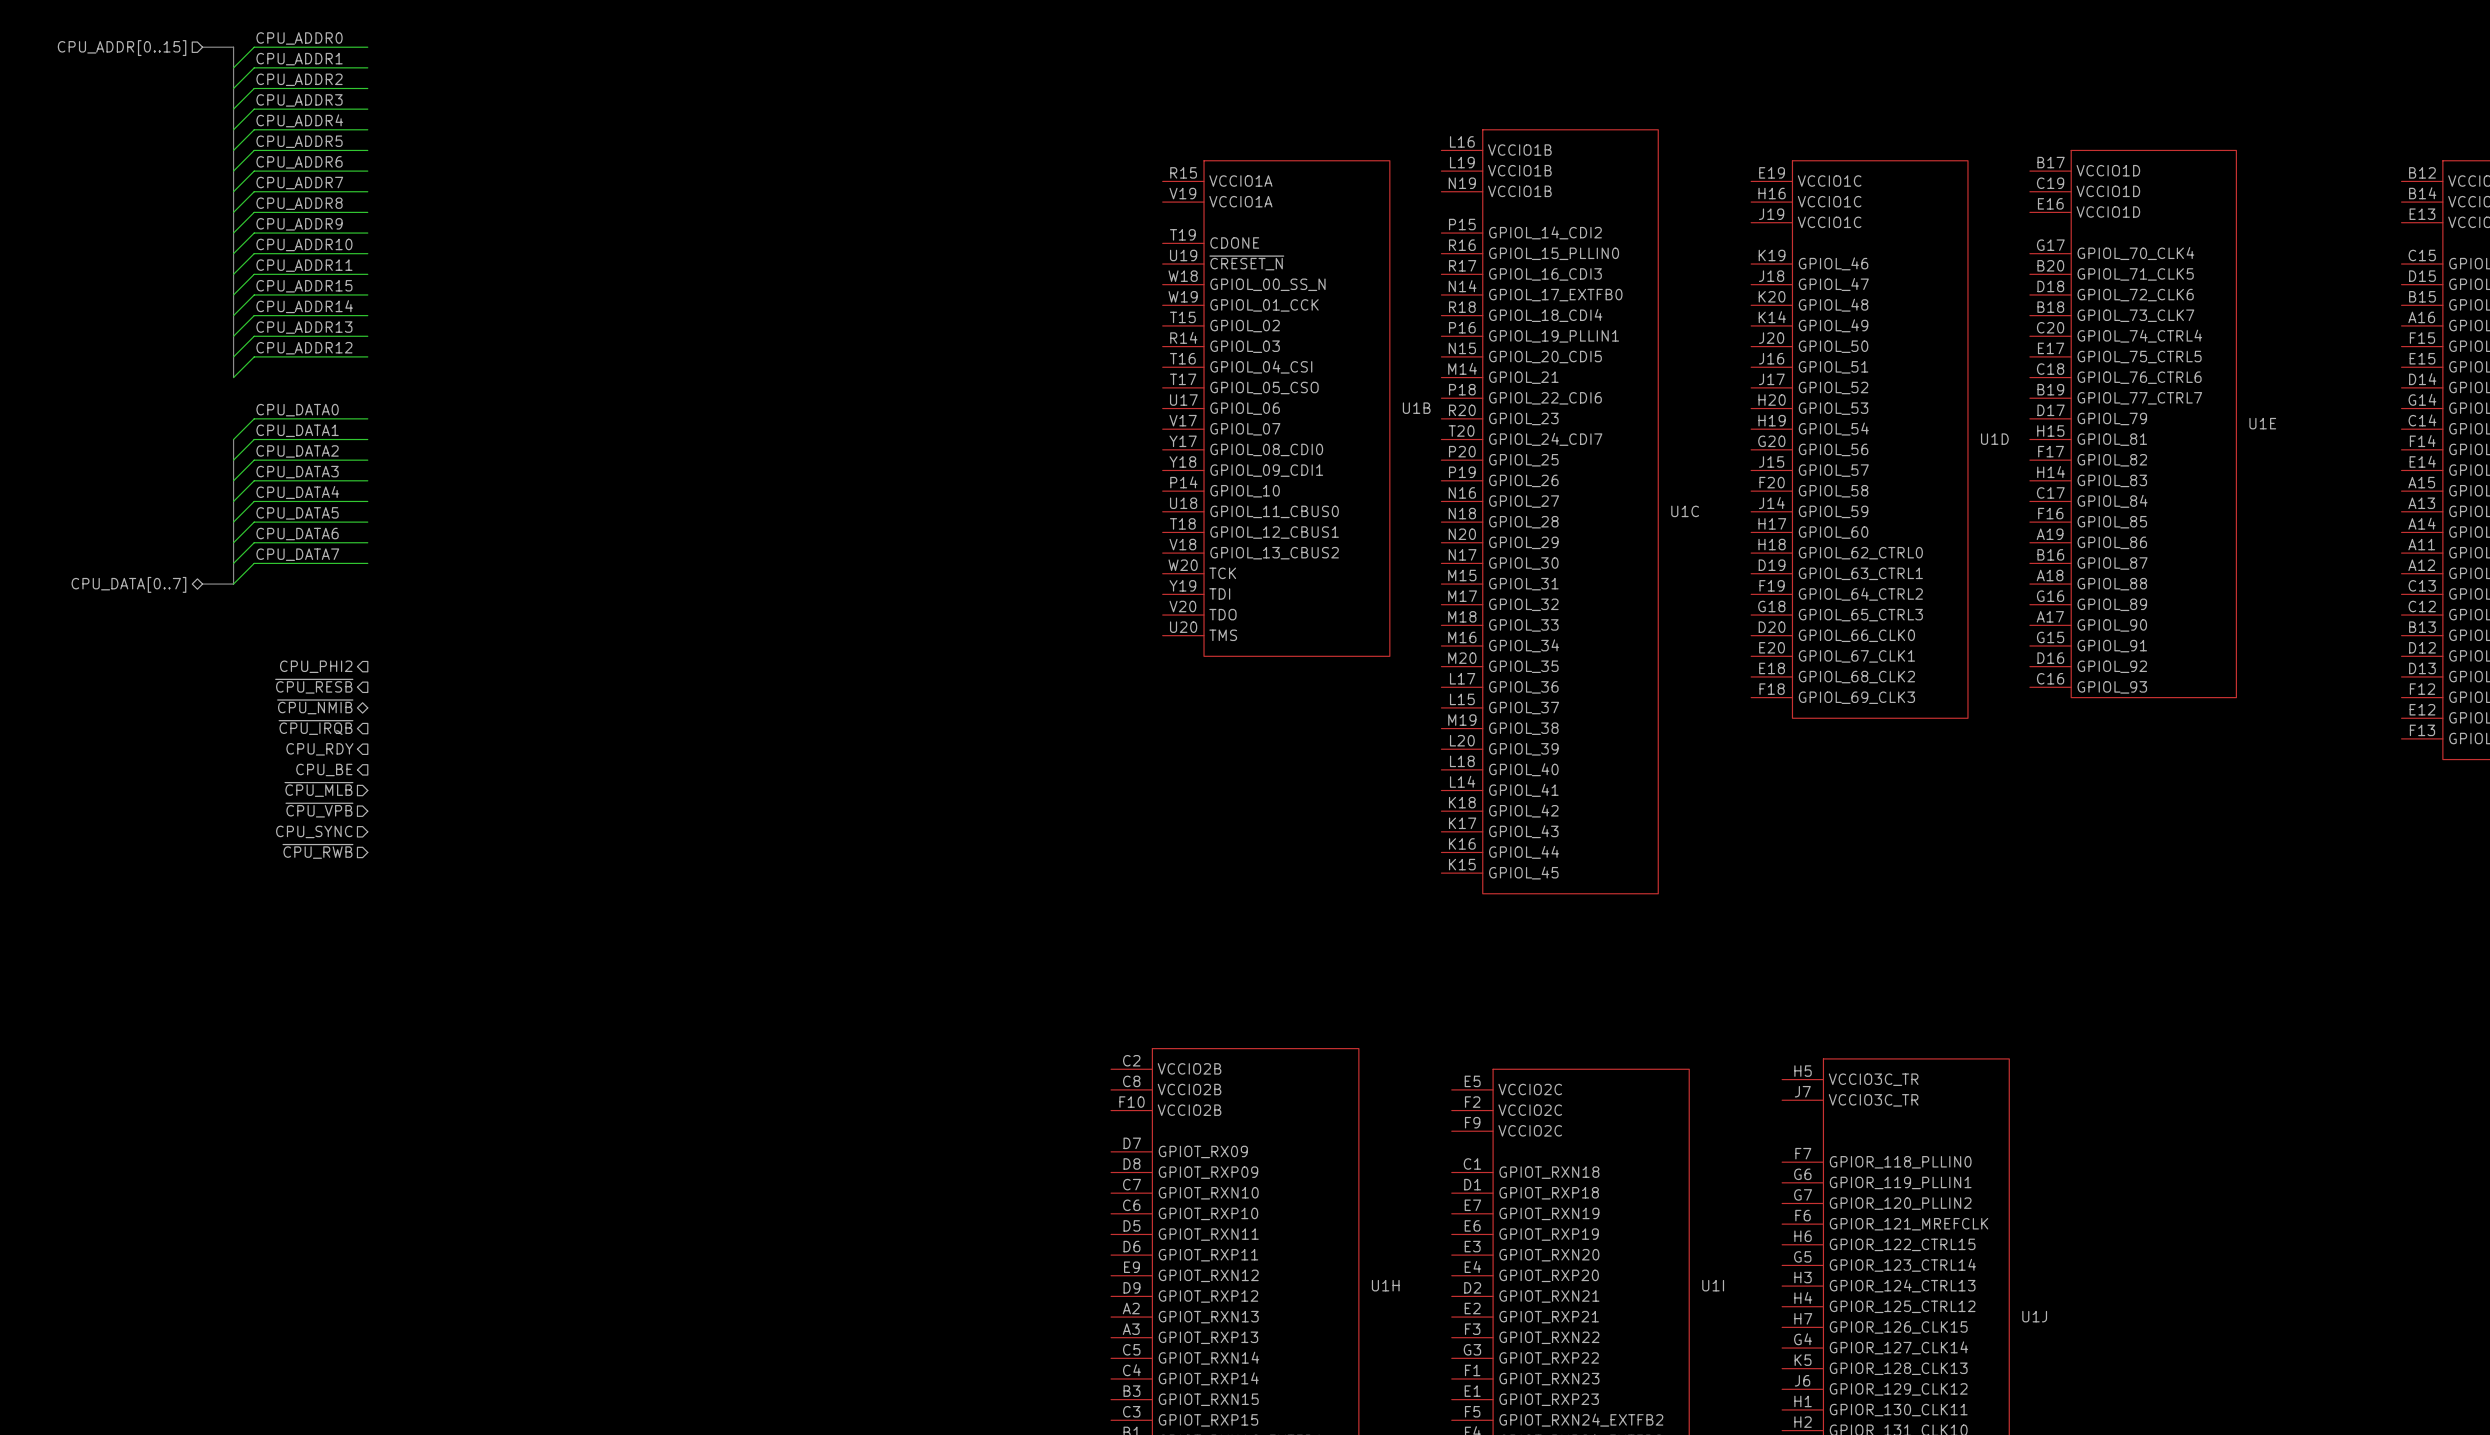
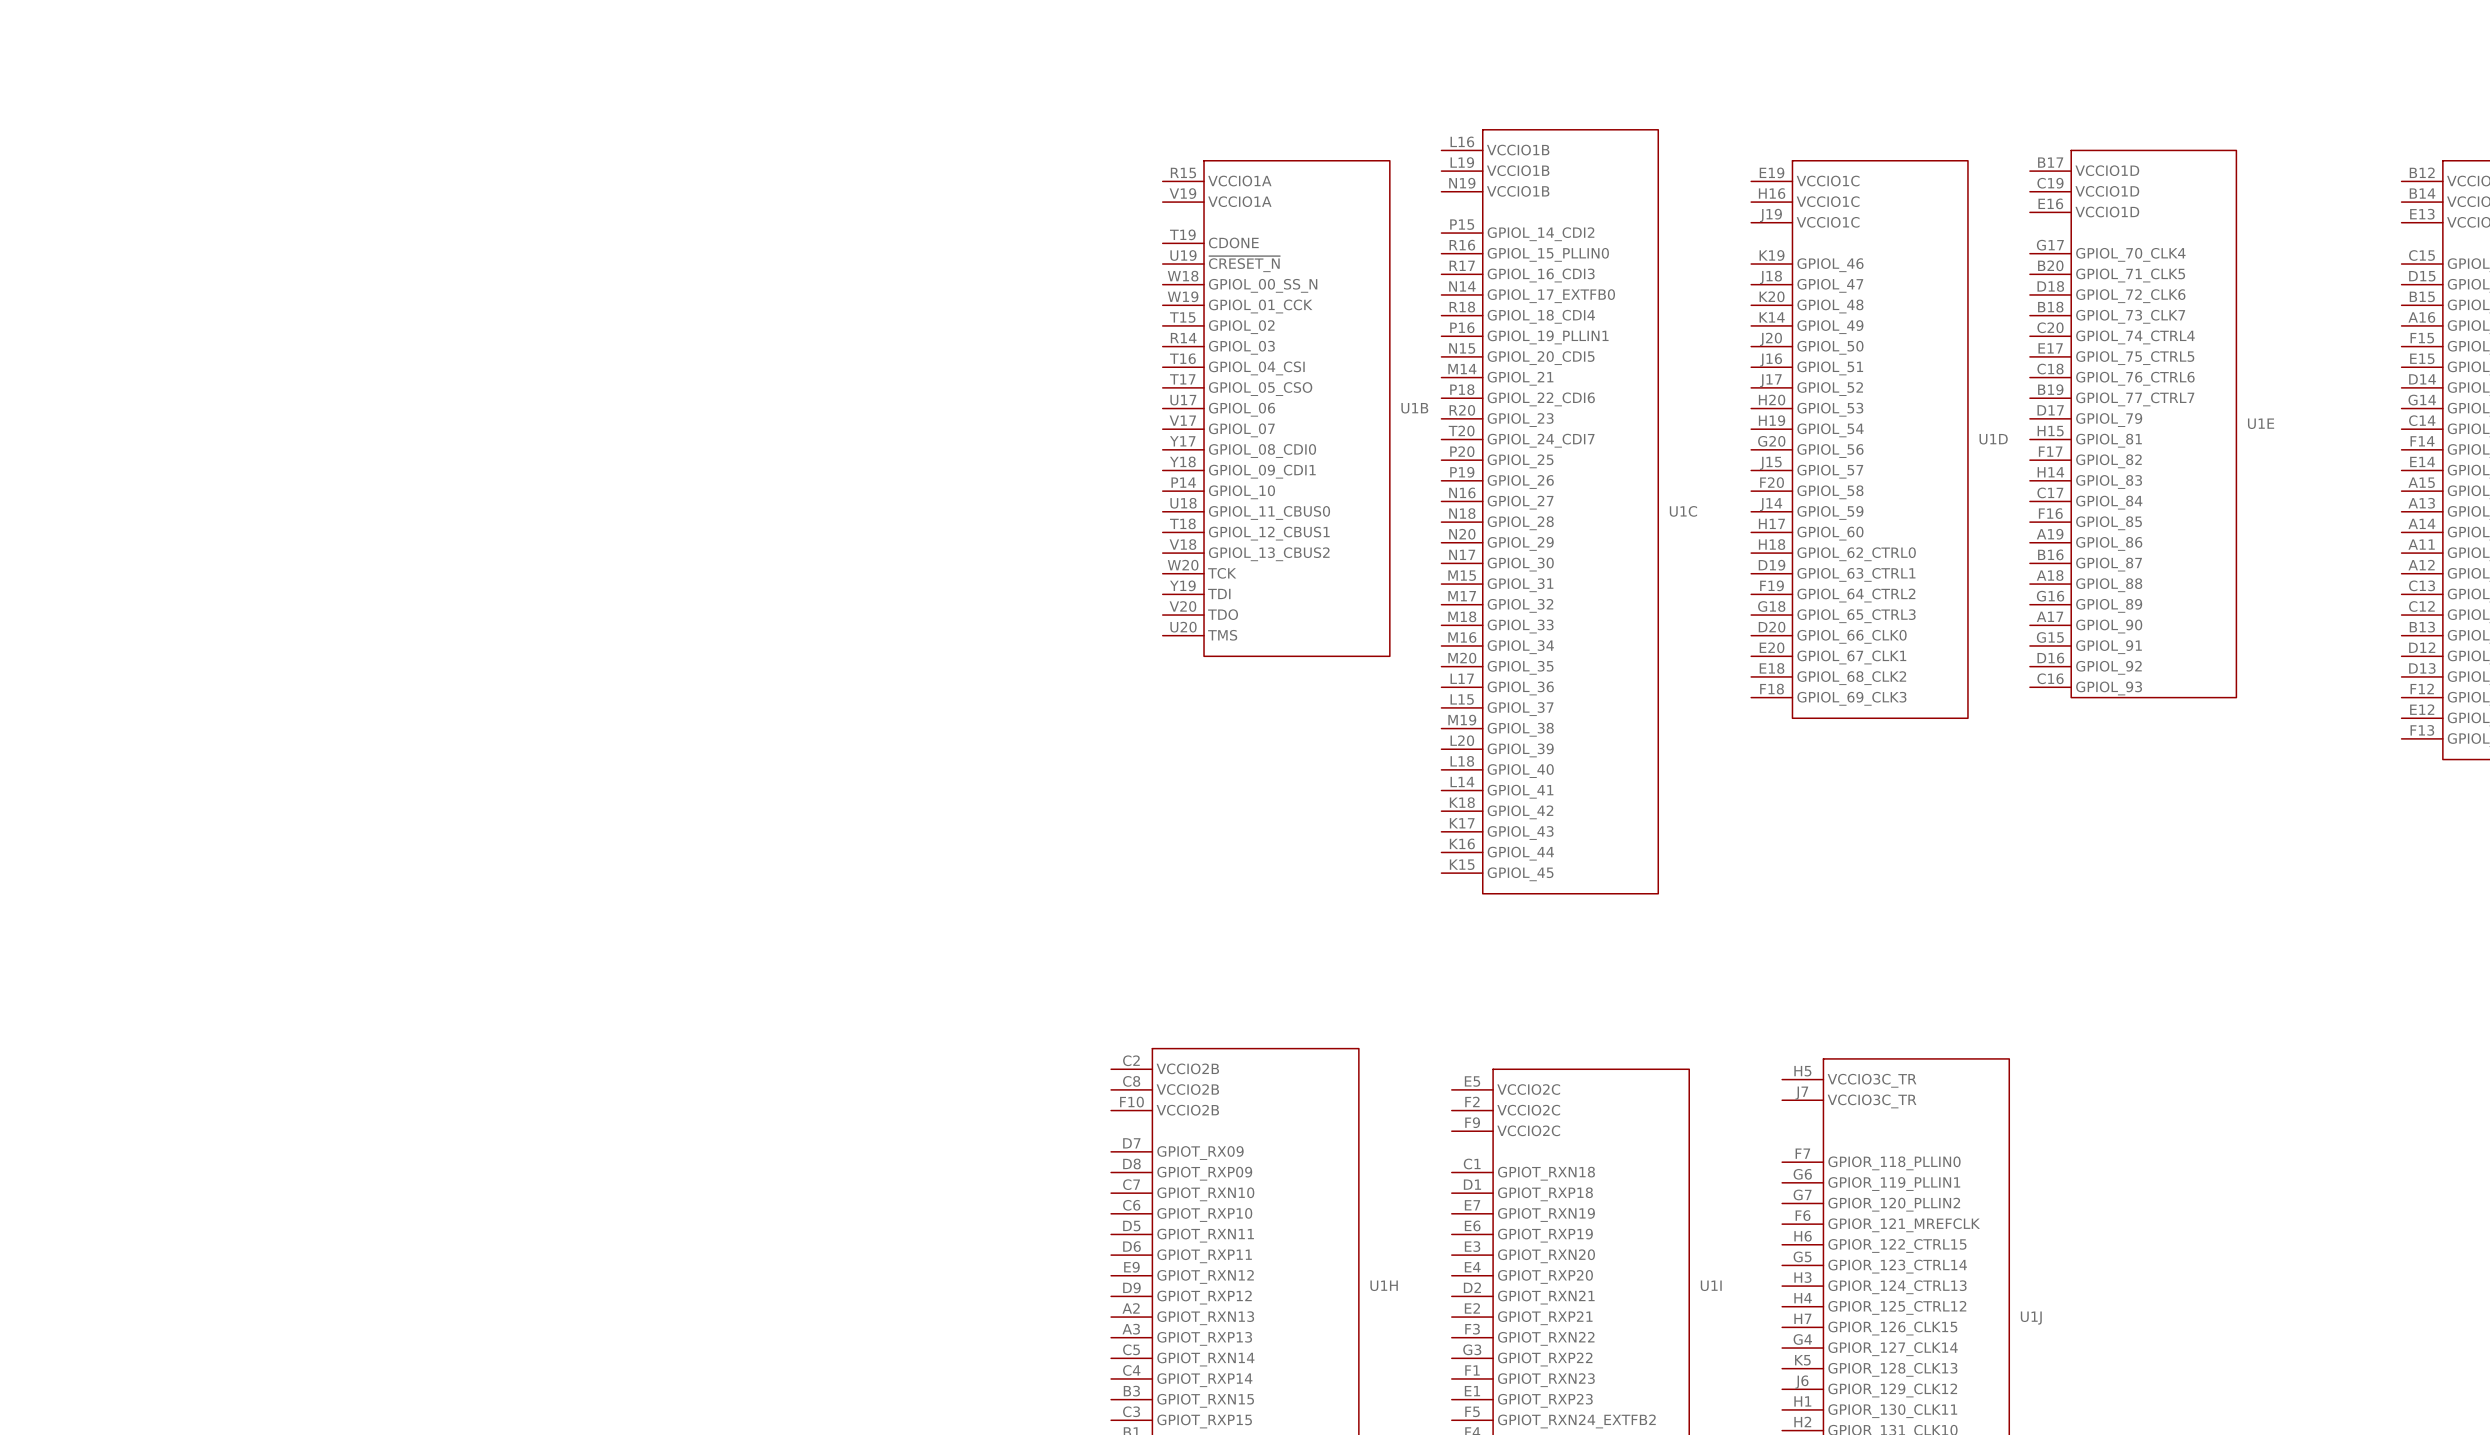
label: CPU_ADDR0 (299, 38) -> none
bus: (202, 47) (233, 47) (233, 377) -> none
wire: (367, 47) (254, 47) (233, 67) -> none
hierarchical label: CPU_ADDR[0..15] (122, 48) -> none
label: CPU_ADDR1 (299, 59) -> none
wire: (367, 67) (254, 67) (233, 88) -> none
label: CPU_ADDR2 (299, 79) -> none
wire: (367, 88) (254, 88) (233, 109) -> none
label: CPU_ADDR3 (299, 100) -> none
wire: (367, 109) (254, 109) (233, 129) -> none
label: CPU_ADDR4 (299, 120) -> none
wire: (367, 129) (254, 129) (233, 150) -> none
label: CPU_ADDR5 (299, 141) -> none
wire: (367, 150) (254, 150) (233, 171) -> none
label: CPU_ADDR6 (299, 162) -> none
wire: (367, 171) (254, 171) (233, 191) -> none
label: CPU_ADDR7 (299, 183) -> none
wire: (367, 191) (254, 191) (233, 212) -> none
label: CPU_ADDR8 (299, 203) -> none
wire: (367, 212) (254, 212) (233, 233) -> none
label: CPU_ADDR9 (299, 224) -> none
wire: (367, 233) (254, 233) (233, 253) -> none
label: CPU_ADDR10 (304, 244) -> none
wire: (367, 253) (254, 253) (233, 274) -> none
label: CPU_ADDR11 (304, 265) -> none
wire: (367, 274) (254, 274) (233, 294) -> none
label: CPU_ADDR15 (304, 286) -> none
wire: (367, 294) (254, 294) (233, 315) -> none
label: CPU_ADDR14 (304, 306) -> none
wire: (367, 315) (254, 315) (233, 336) -> none
label: CPU_ADDR13 (304, 327) -> none
wire: (367, 336) (254, 336) (233, 356) -> none
label: CPU_ADDR12 (304, 348) -> none
wire: (367, 356) (254, 356) (233, 377) -> none
label: CPU_DATA0 (297, 410) -> none
wire: (367, 418) (254, 418) (233, 439) -> none
label: CPU_DATA1 (297, 430) -> none
bus: (233, 439) (233, 584) (202, 584) -> none
wire: (367, 439) (254, 439) (233, 460) -> none
label: CPU_DATA2 (297, 451) -> none
wire: (367, 460) (254, 460) (233, 480) -> none
label: CPU_DATA3 (297, 472) -> none
wire: (367, 480) (254, 480) (233, 501) -> none
label: CPU_DATA4 (297, 492) -> none
wire: (367, 501) (254, 501) (233, 522) -> none
label: CPU_DATA5 (297, 513) -> none
wire: (367, 522) (254, 522) (233, 542) -> none
label: CPU_DATA6 (297, 534) -> none
wire: (367, 542) (254, 542) (233, 563) -> none
label: CPU_DATA7 (297, 554) -> none
wire: (367, 563) (254, 563) (233, 584) -> none
hierarchical label: CPU_DATA[0..7] (128, 584) -> none
hierarchical label: CPU_PHI2 (316, 666) -> none
hierarchical label: ~{CPU_RESB} (314, 686) -> none
hierarchical label: ~{CPU_NMIB} (315, 706) -> none
hierarchical label: ~{CPU_IRQB} (315, 727) -> none
hierarchical label: CPU_RDY (319, 749) -> none
hierarchical label: CPU_BE (324, 769) -> none
hierarchical label: ~{CPU_MLB} (318, 789) -> none
hierarchical label: ~{CPU_VPB} (319, 810) -> none
hierarchical label: CPU_SYNC (314, 831) -> none
hierarchical label: ~{CPU_RWB} (317, 851) -> none

